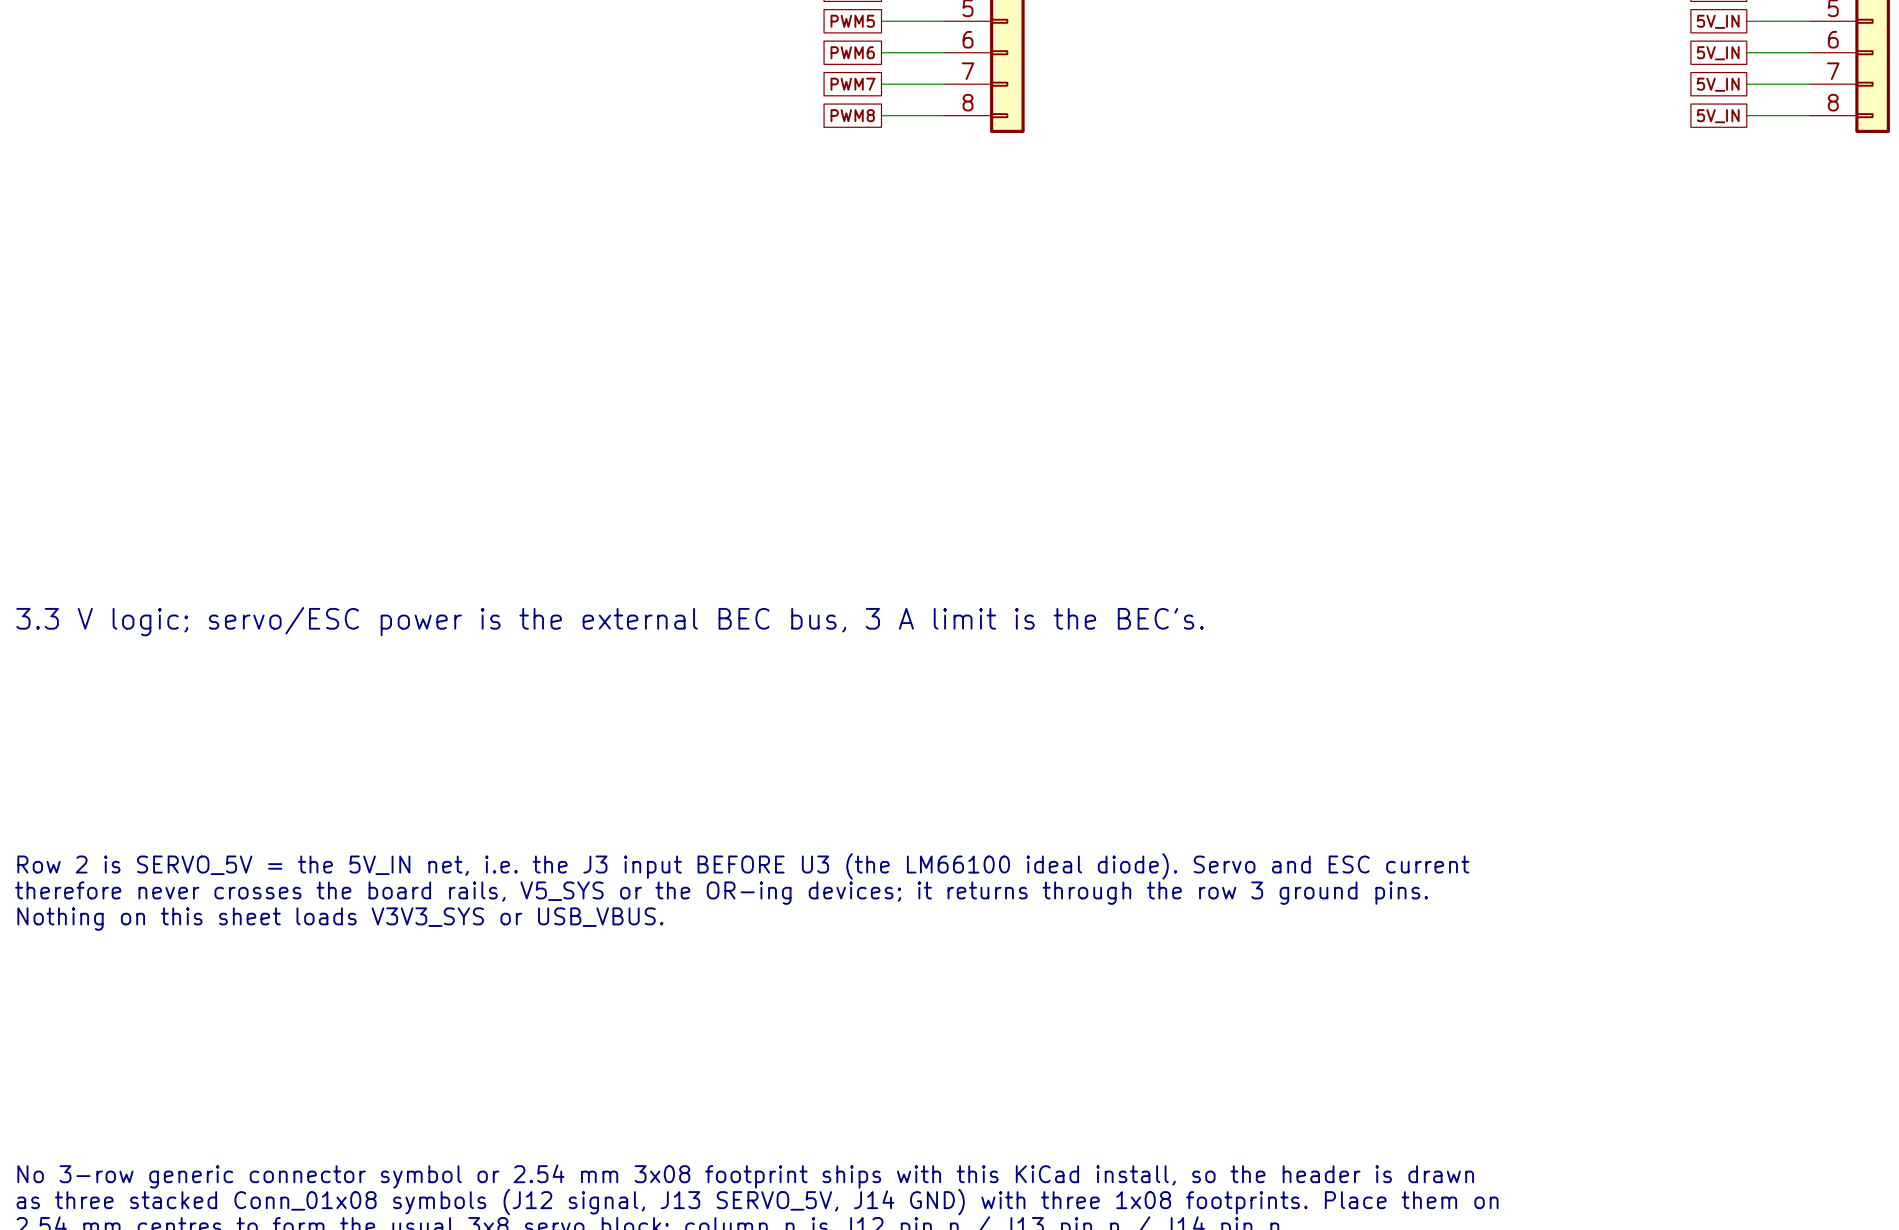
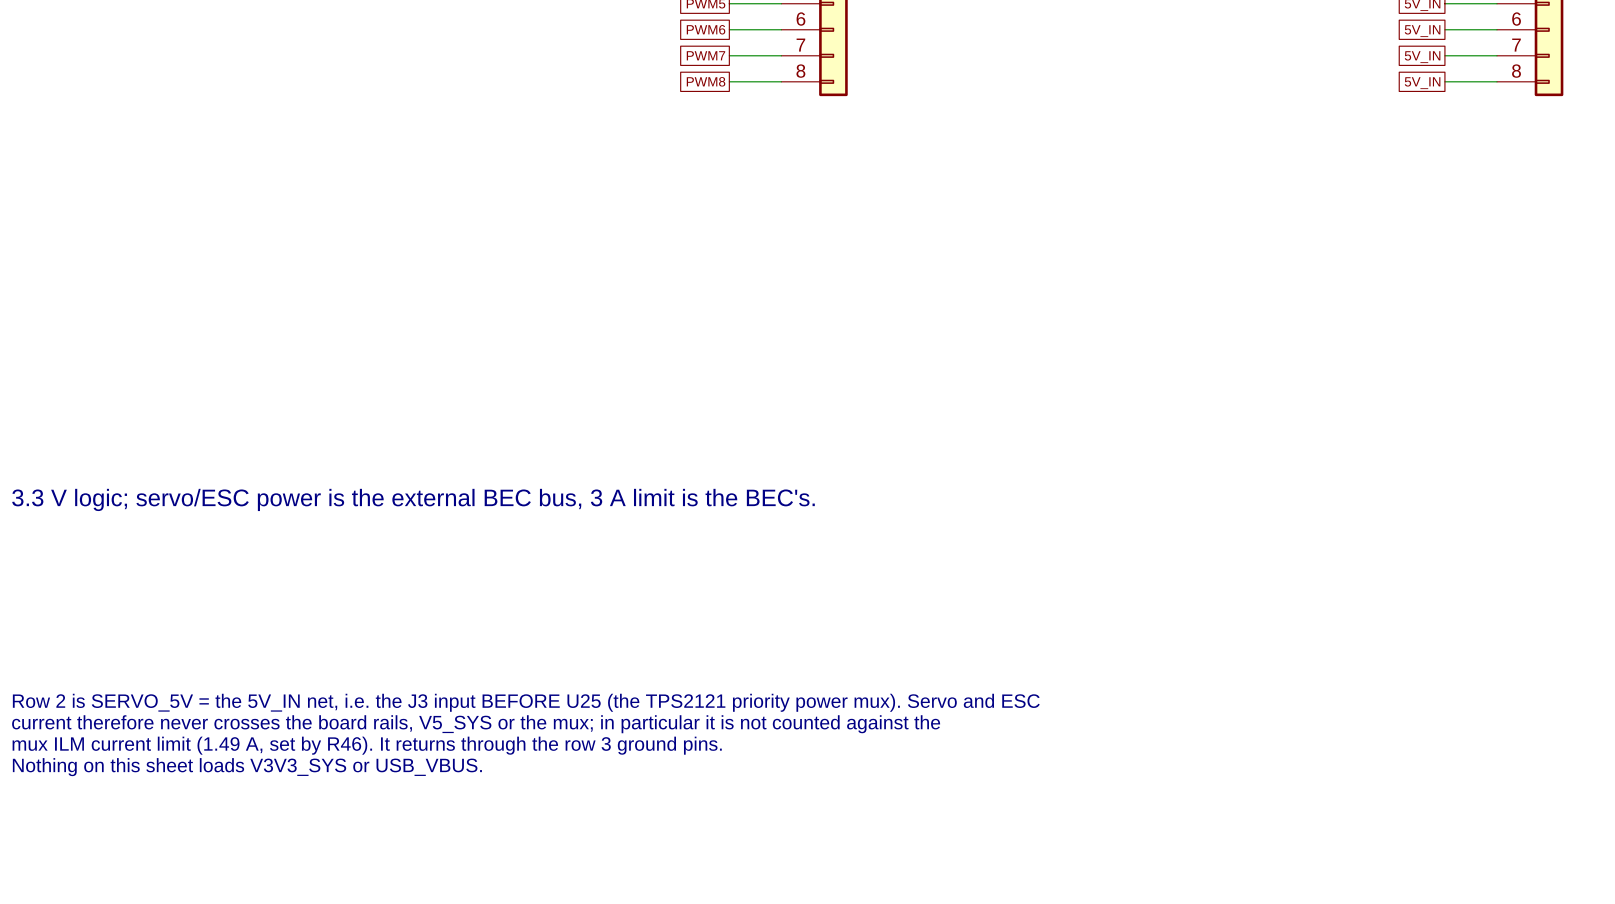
text: Row 2 is SERVO_5V = the 5V_IN net, i.e. the J3 input BEFORE U3 (the LM66100 ideal diode). Servo and ESC current (743, 866) -> Row 2 is SERVO_5V = the 5V_IN net, i.e. the J3 input BEFORE U25 (the TPS2121 priority power mux). Servo and ESC (526, 702)
text: therefore never crosses the board rails, V5_SYS or the OR-ing devices; it returns through the row 3 ground pins. (721, 893) -> current therefore never crosses the board rails, V5_SYS or the mux; in particular it is not counted against the (476, 724)
text: Nothing on this sheet loads V3V3_SYS or USB_VBUS. (340, 919) -> mux ILM current limit (1.49 A, set by R46). It returns through the row 3 ground pins. (367, 745)
text: none -> Nothing on this sheet loads V3V3_SYS or USB_VBUS. (247, 767)

